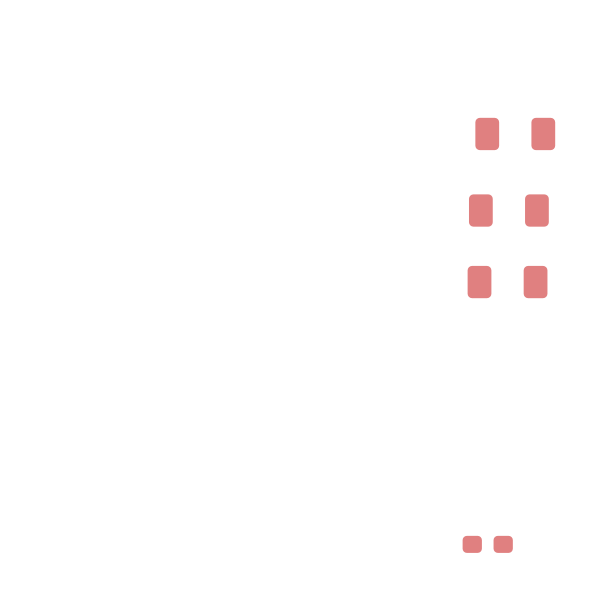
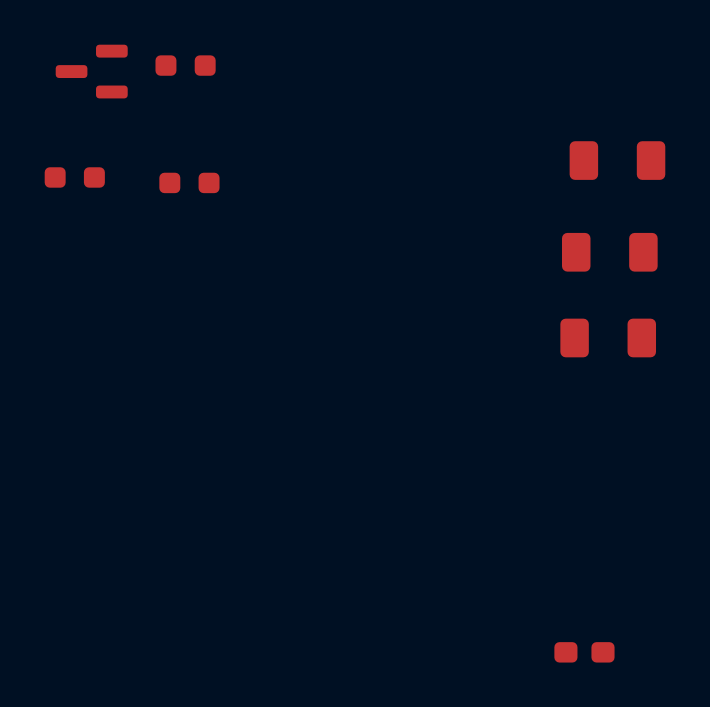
part: none -> (185, 65)
part: none -> (91, 71)
part: none -> (74, 177)
part: none -> (189, 182)

